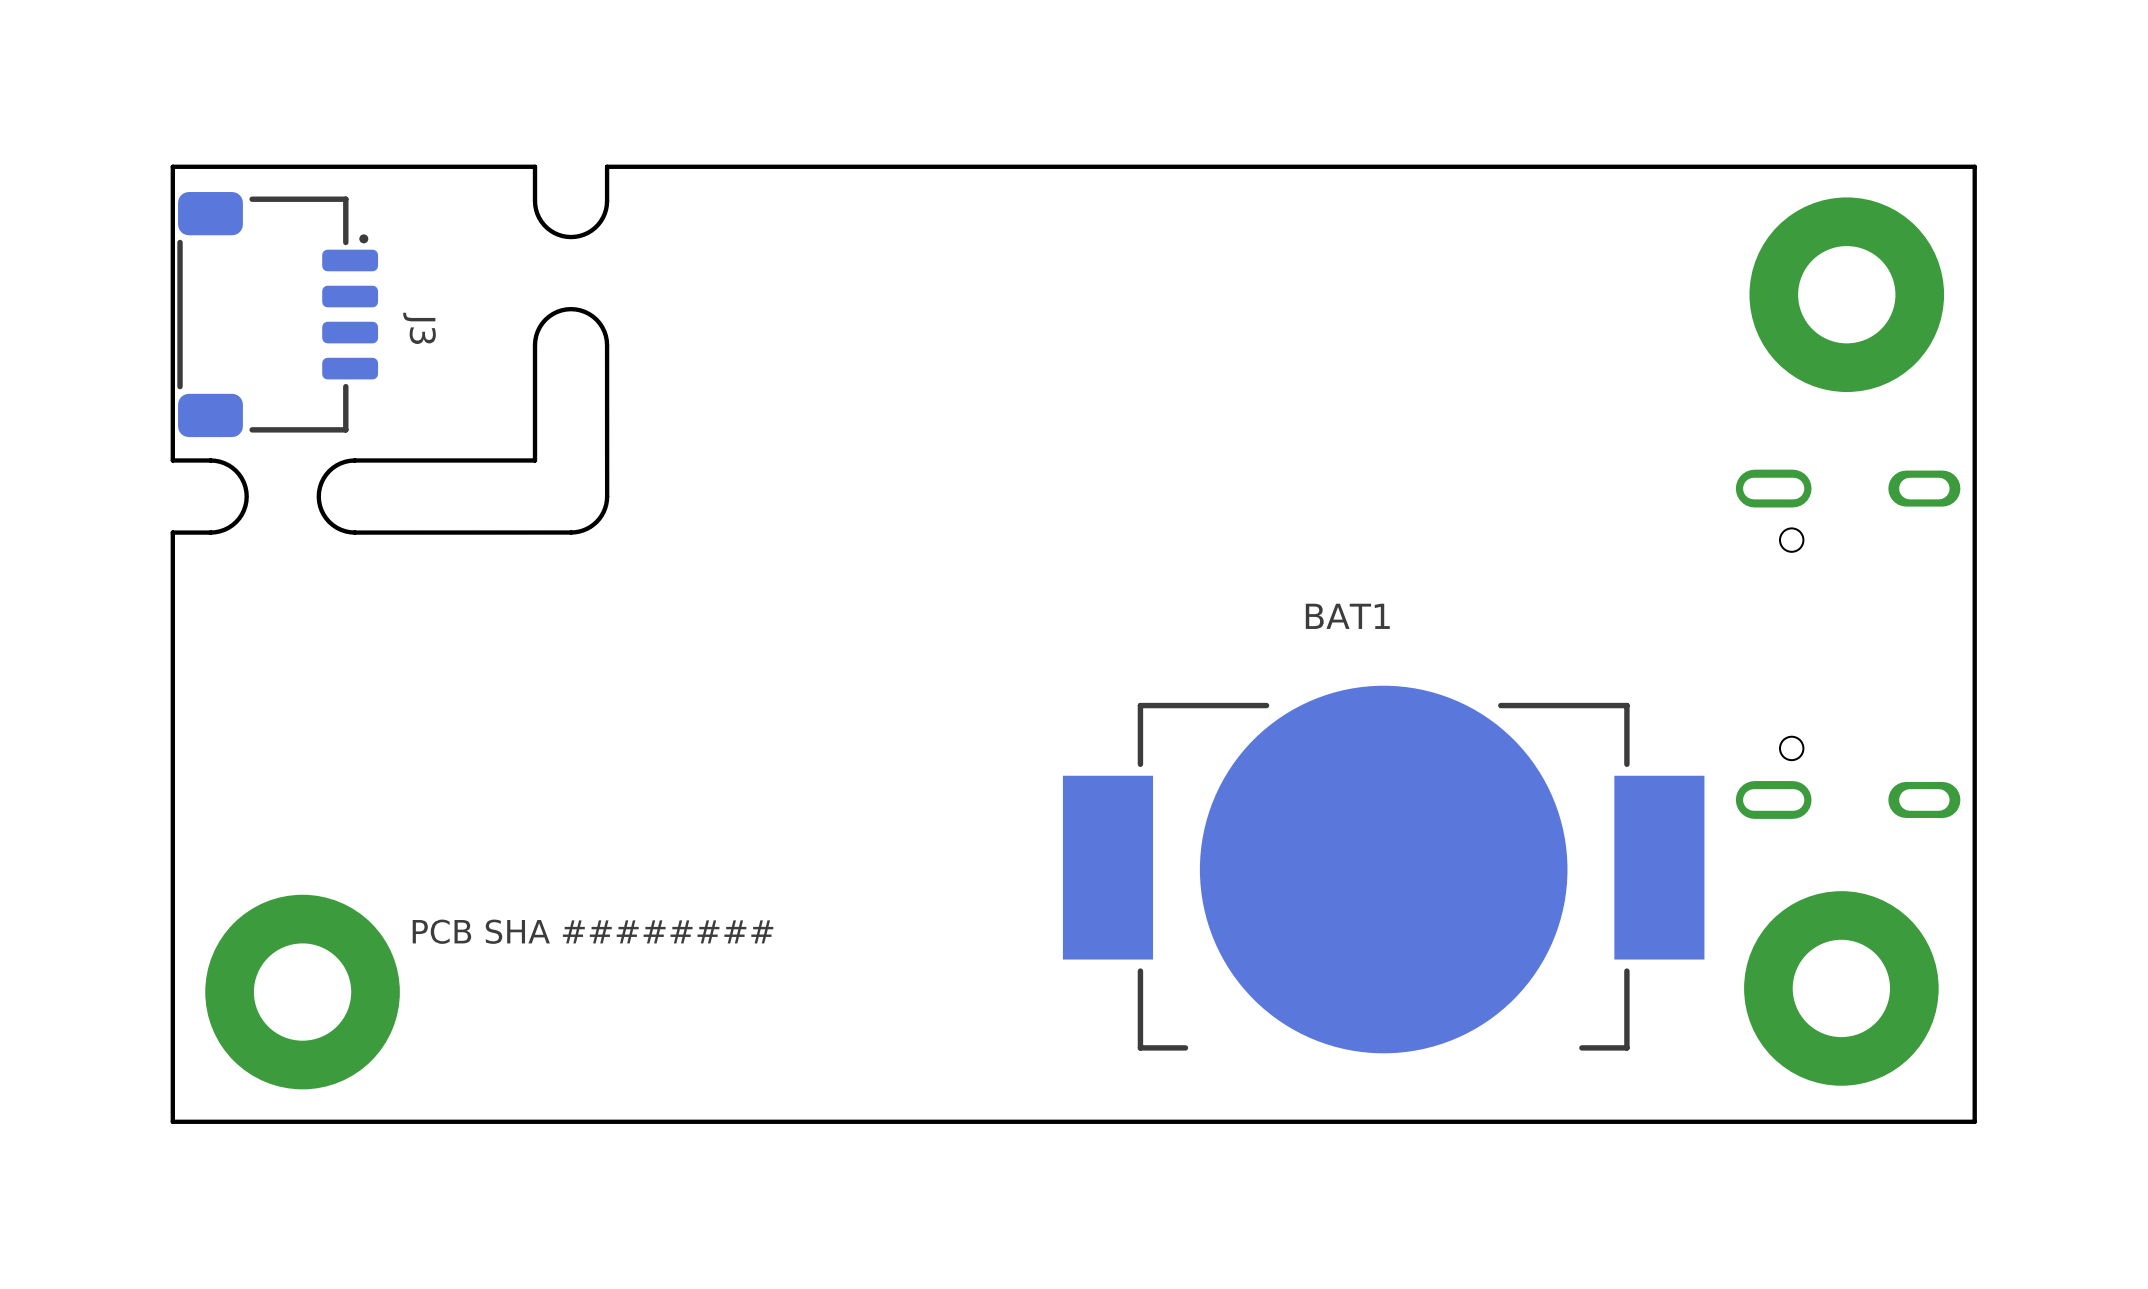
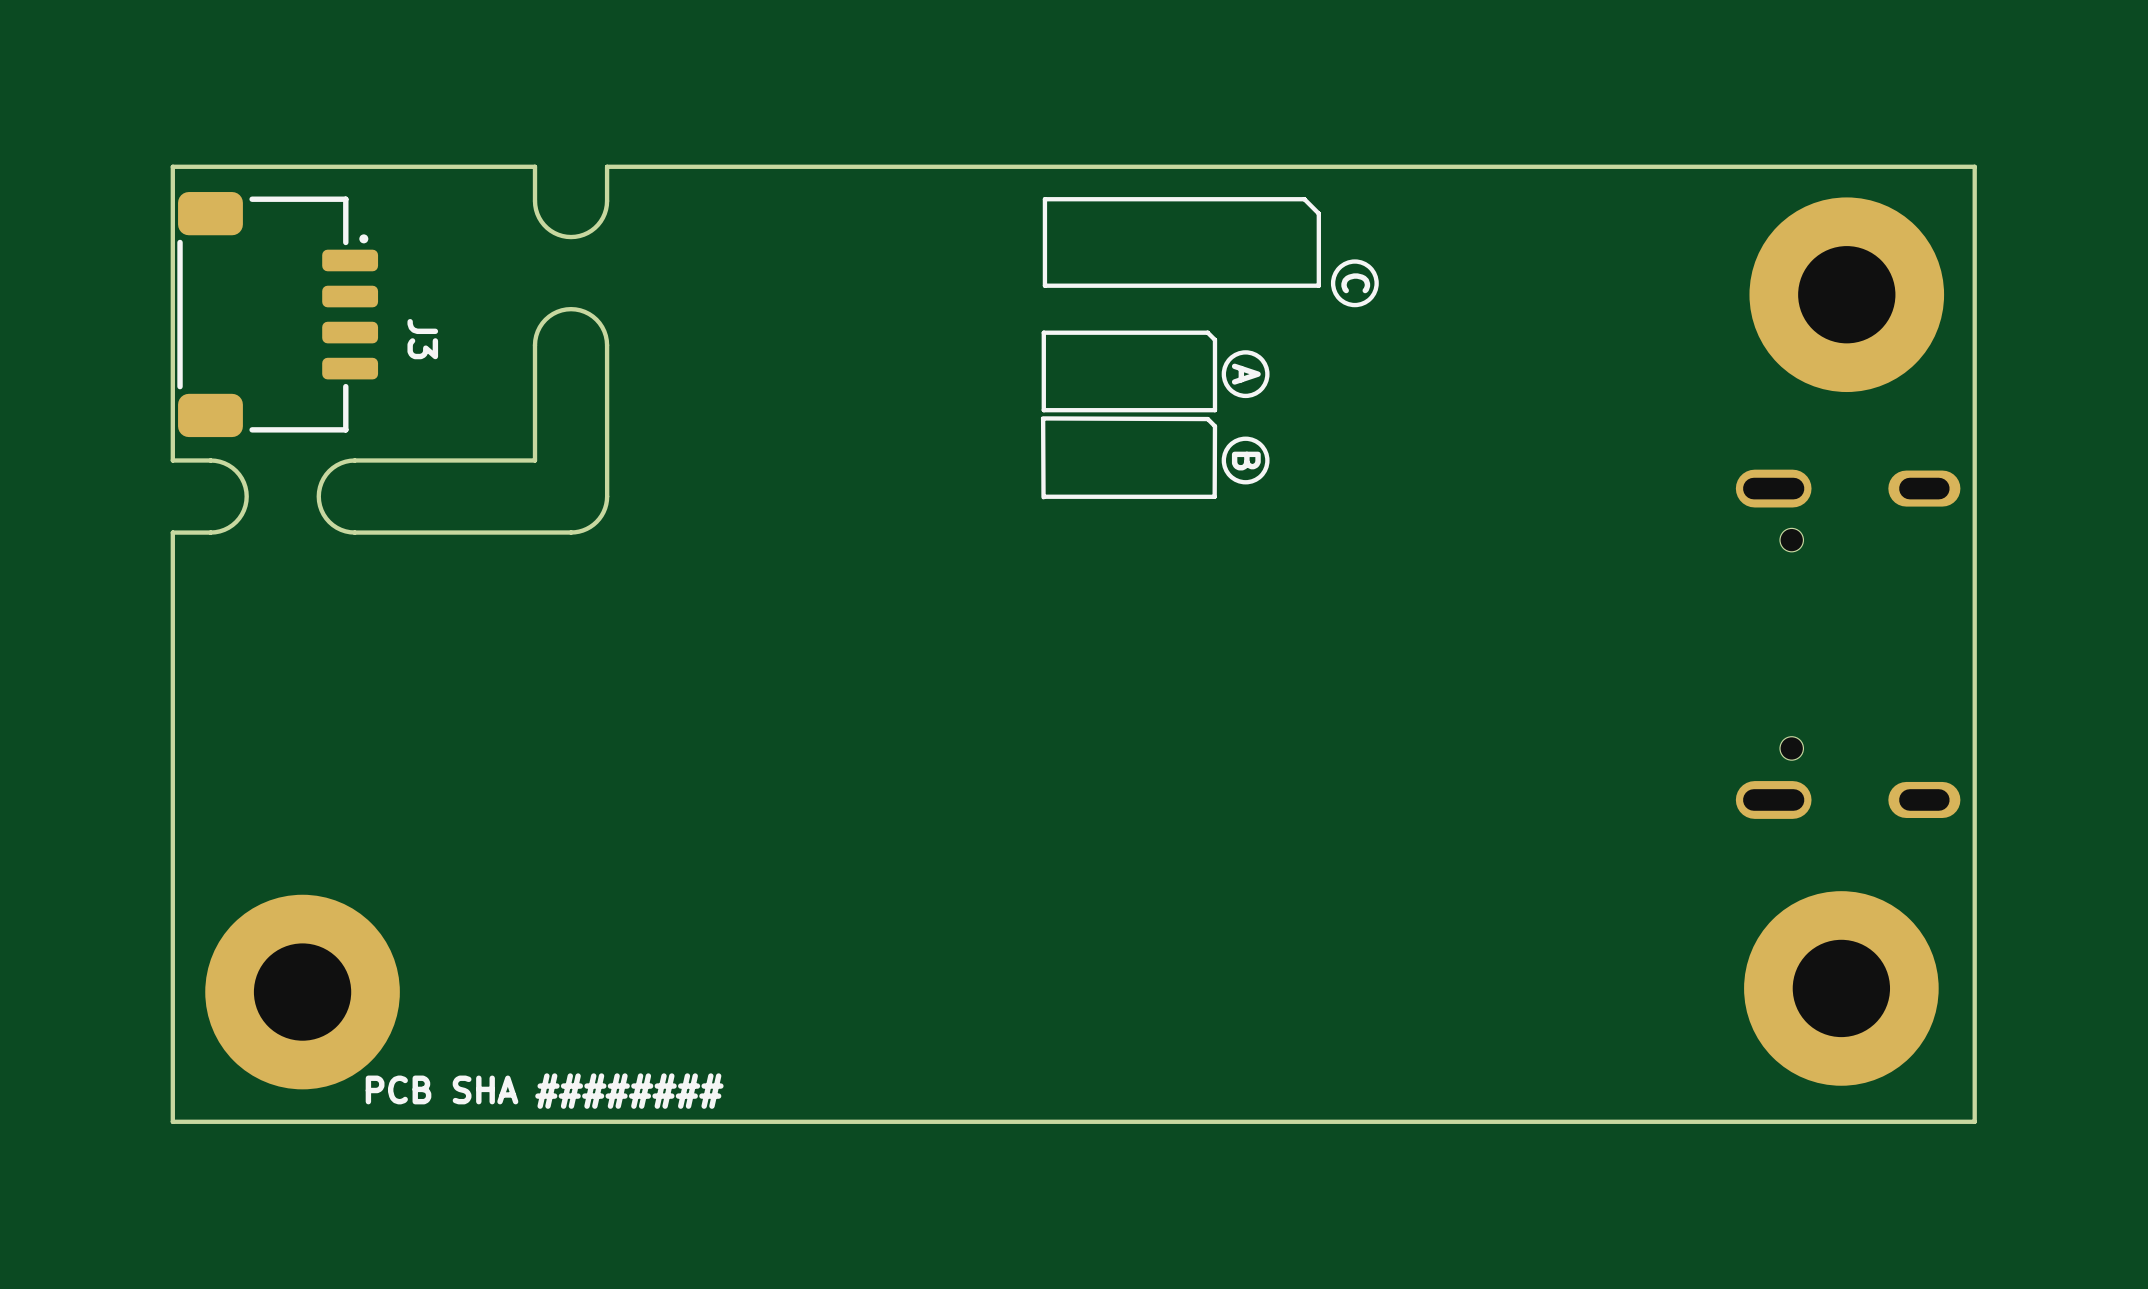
line: none -> (1304, 199) (1318, 213) (1318, 285) (1044, 285) (1044, 199) (1304, 199)
drawing: none -> [1330, 259, 1379, 308]
text: none -> C (1355, 283)
line: none -> (1207, 332) (1214, 339) (1214, 410) (1043, 410) (1043, 332) (1207, 332)
drawing: none -> [1221, 350, 1270, 485]
text: none -> A (1246, 374)
line: none -> (1042, 418) (1207, 419) (1214, 426) (1214, 496)
line: none -> (1043, 419) (1043, 497)
text: none -> B (1246, 461)
line: none -> (1214, 496) (1044, 496)
BAT1: (1383, 869) -> none
text position: PCB SHA ######## (593, 931) -> PCB SHA ######## (544, 1091)

